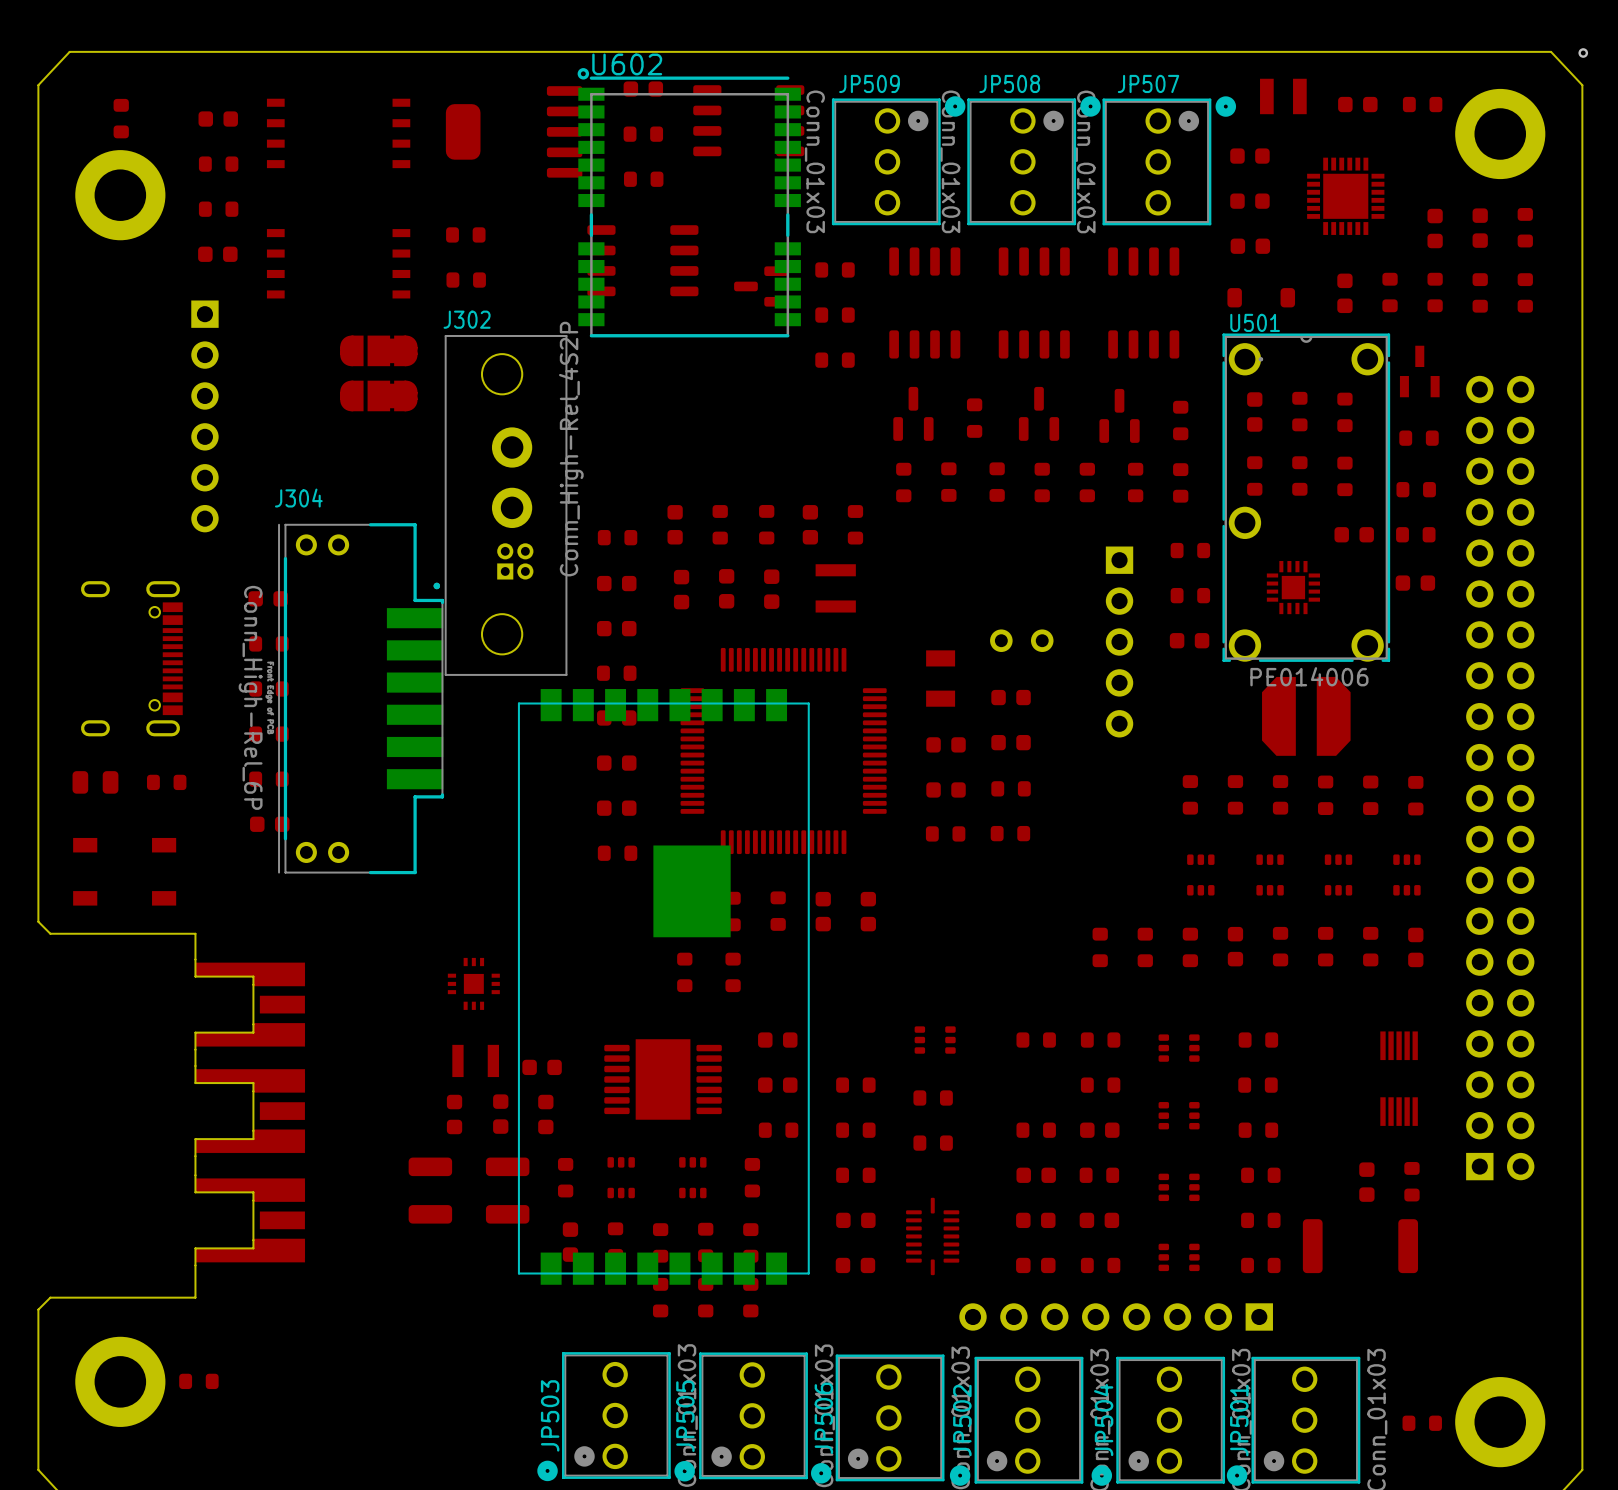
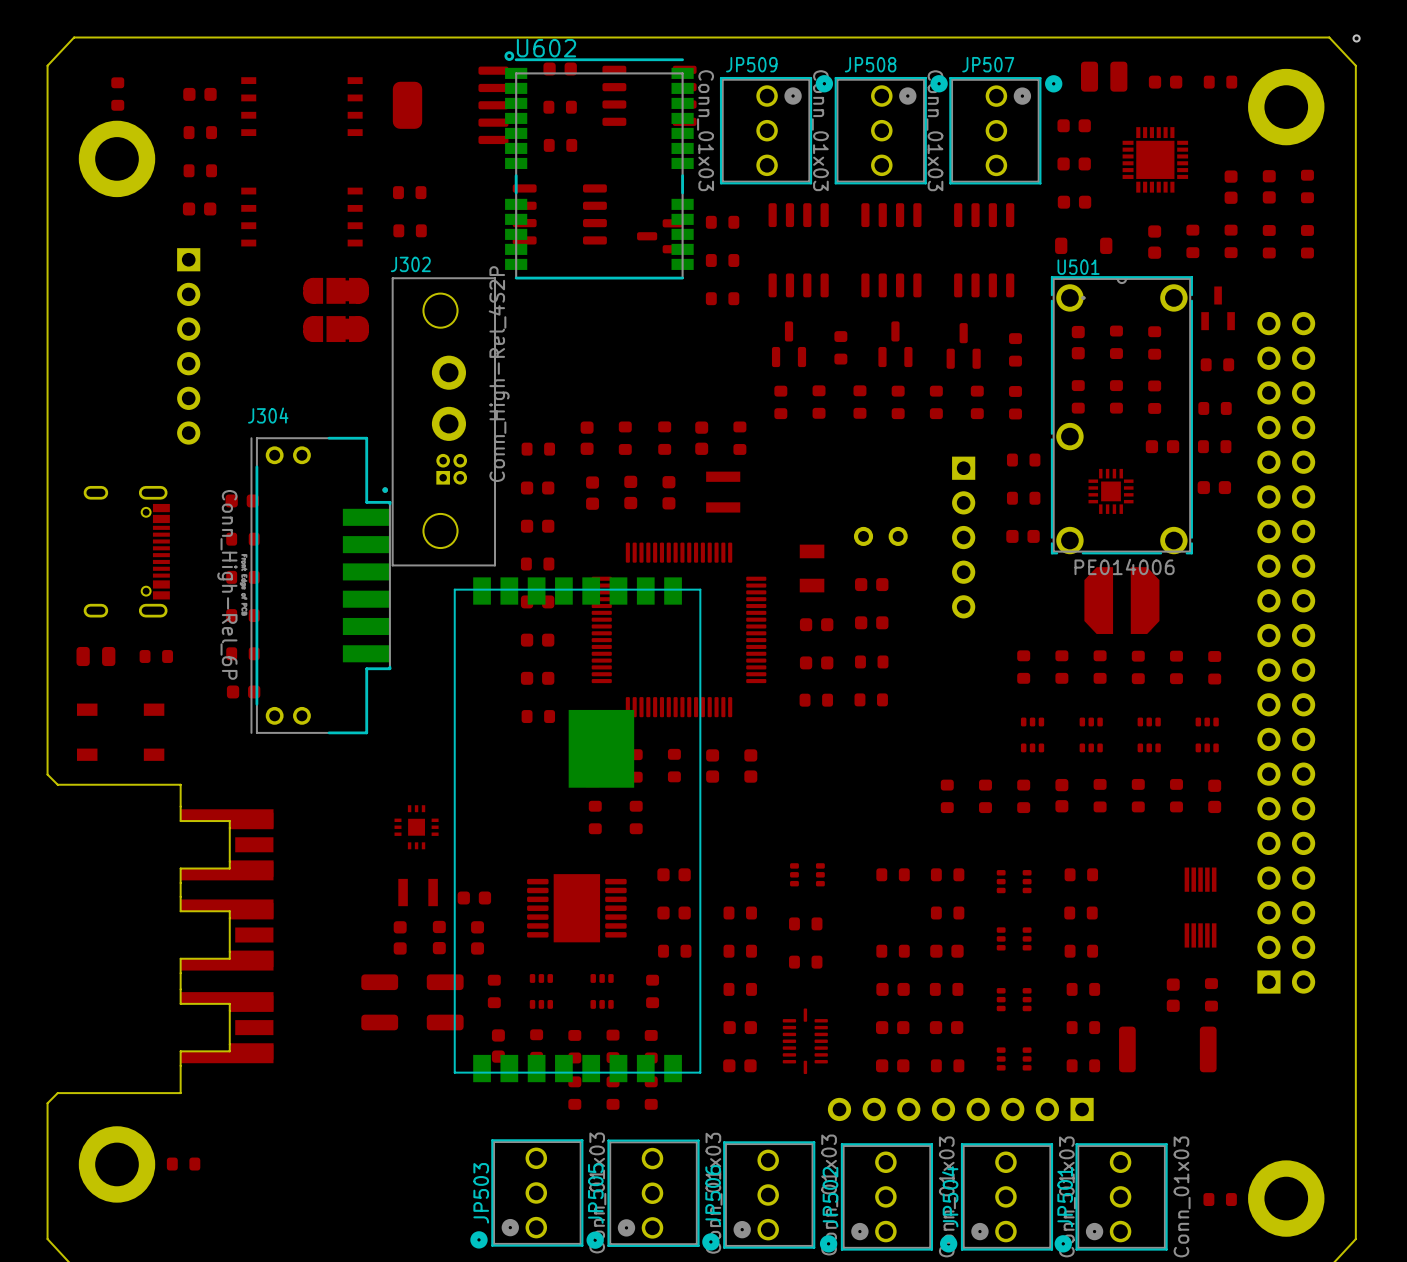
part footprint: [1260, 78, 1307, 115] -> [1080, 61, 1128, 92]

